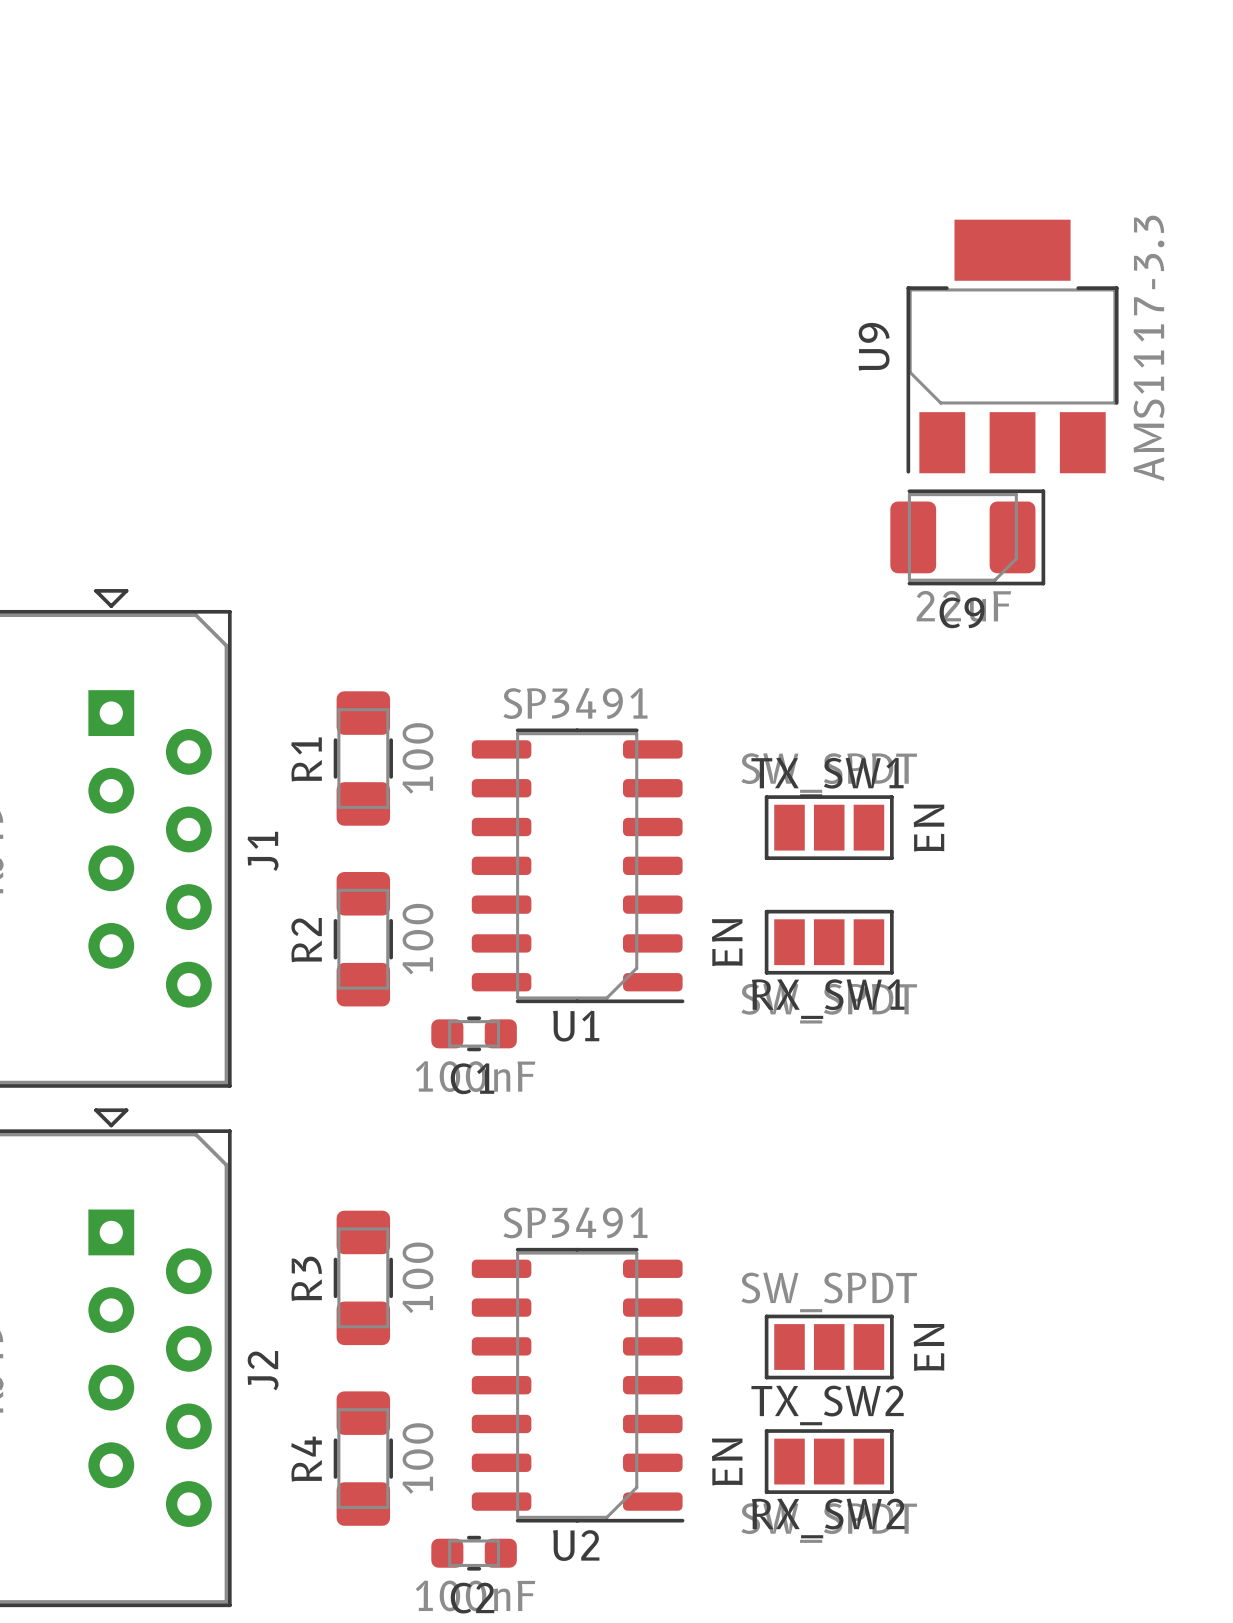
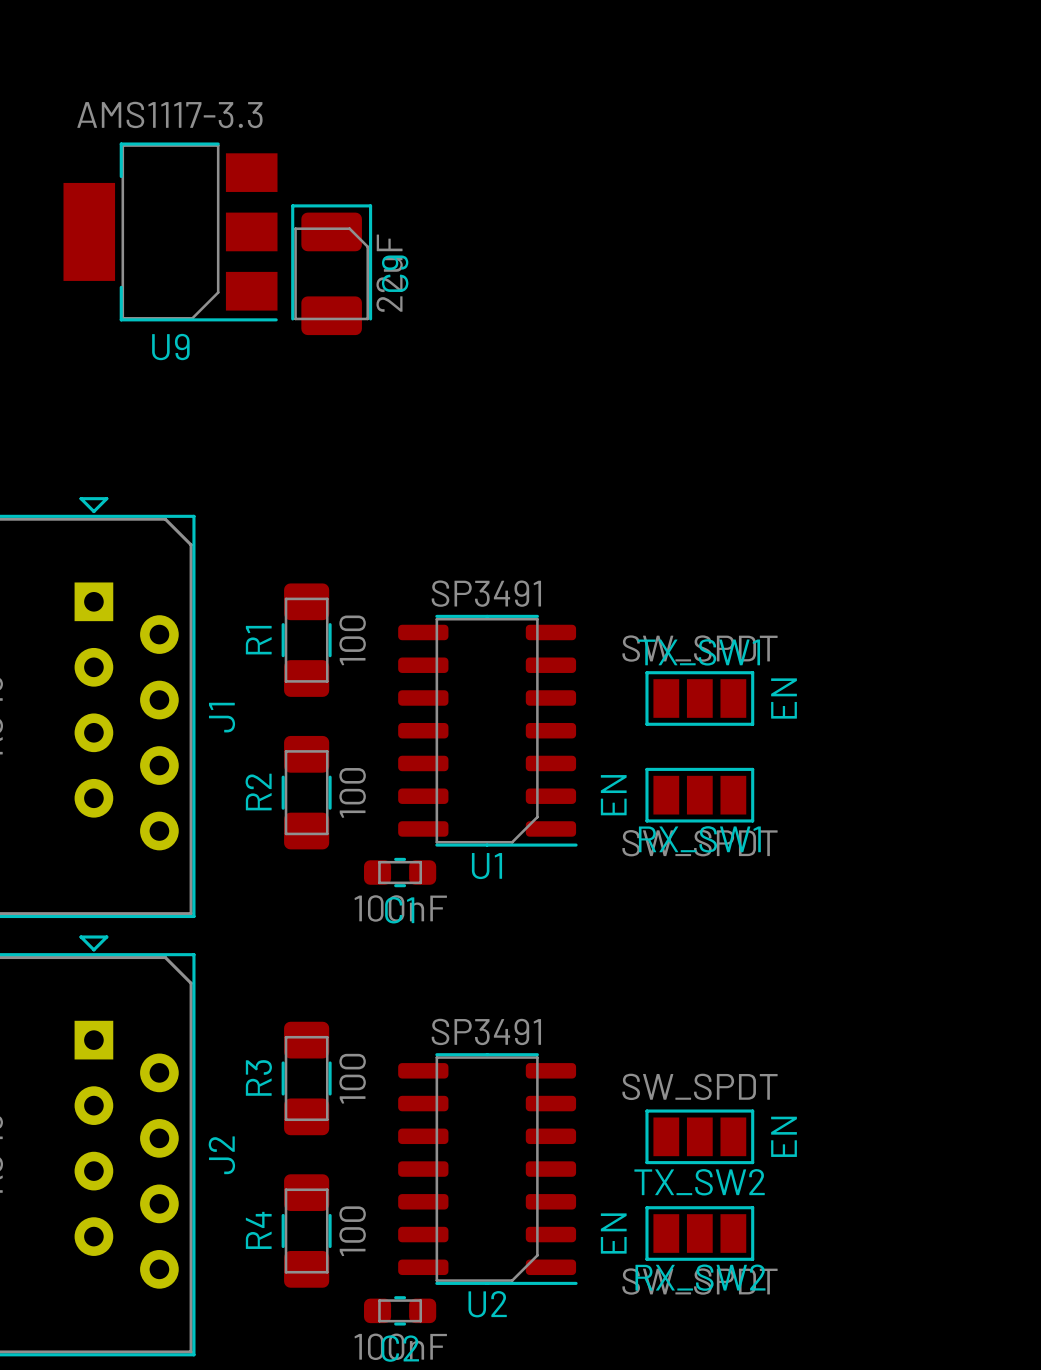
U9 rotation: 0° (1012, 346) -> 90° counterclockwise (170, 231)
U9 position: (1012, 346) -> (170, 231)
C9 rotation: 0° (967, 537) -> 90° counterclockwise (331, 269)
C9 position: (967, 537) -> (331, 269)

